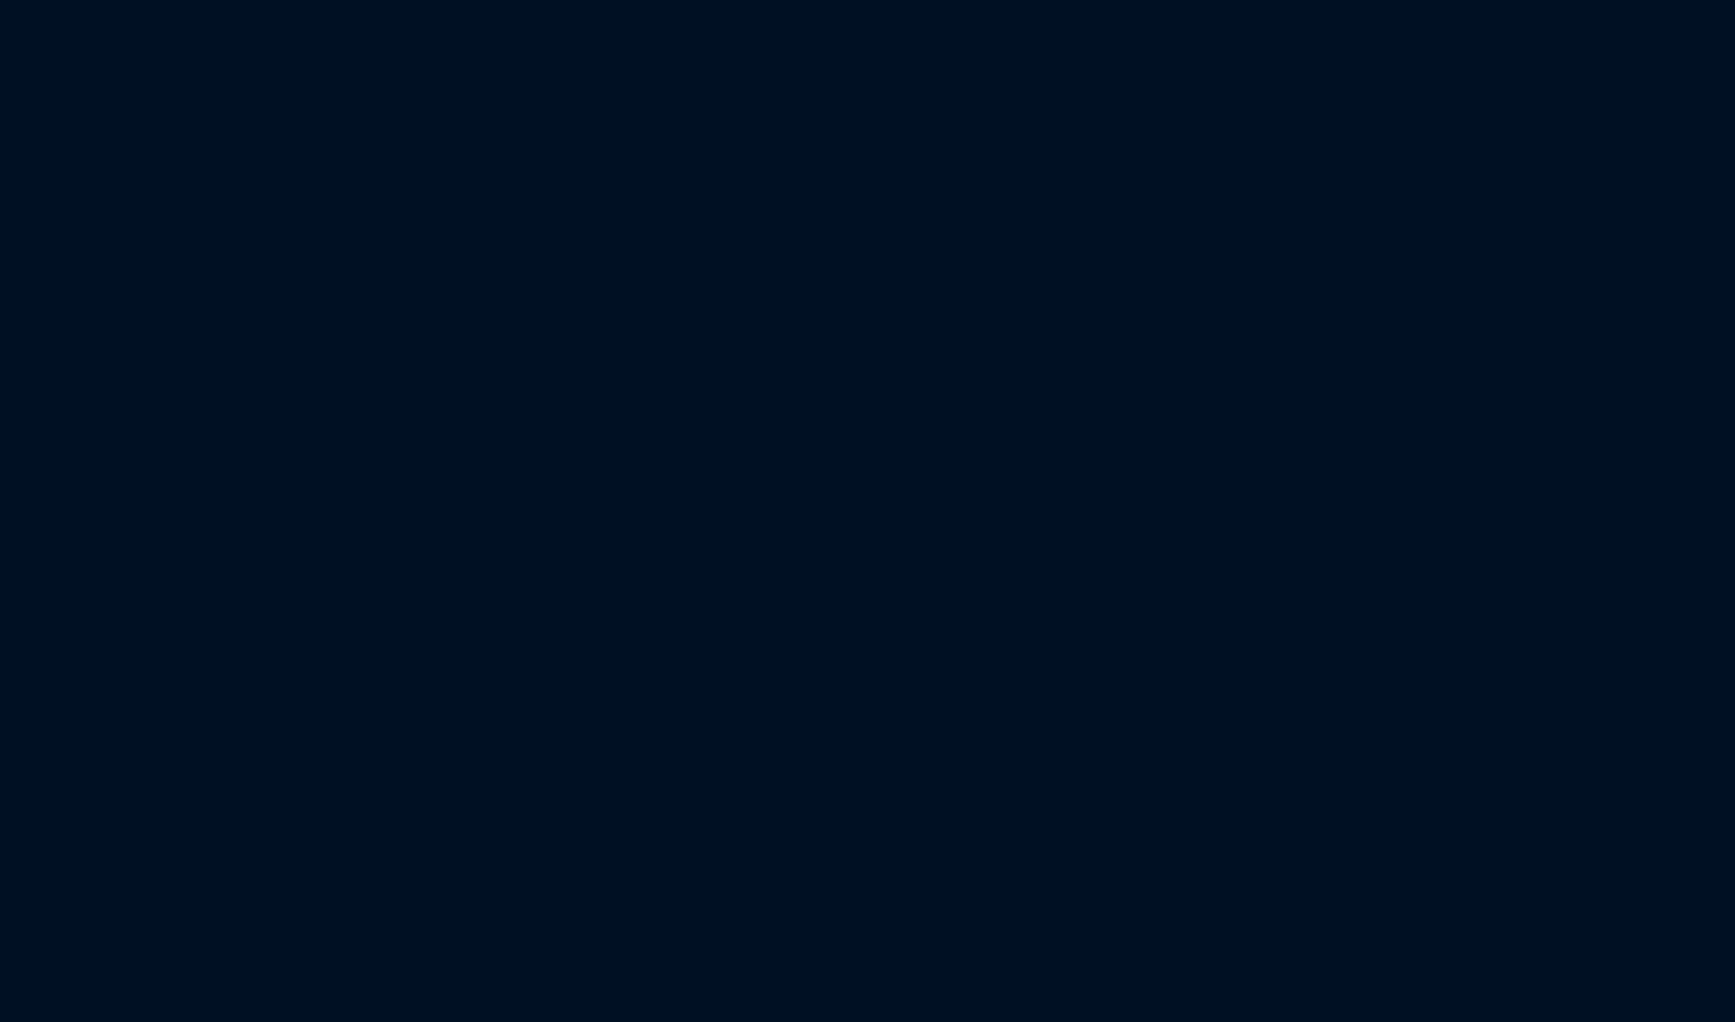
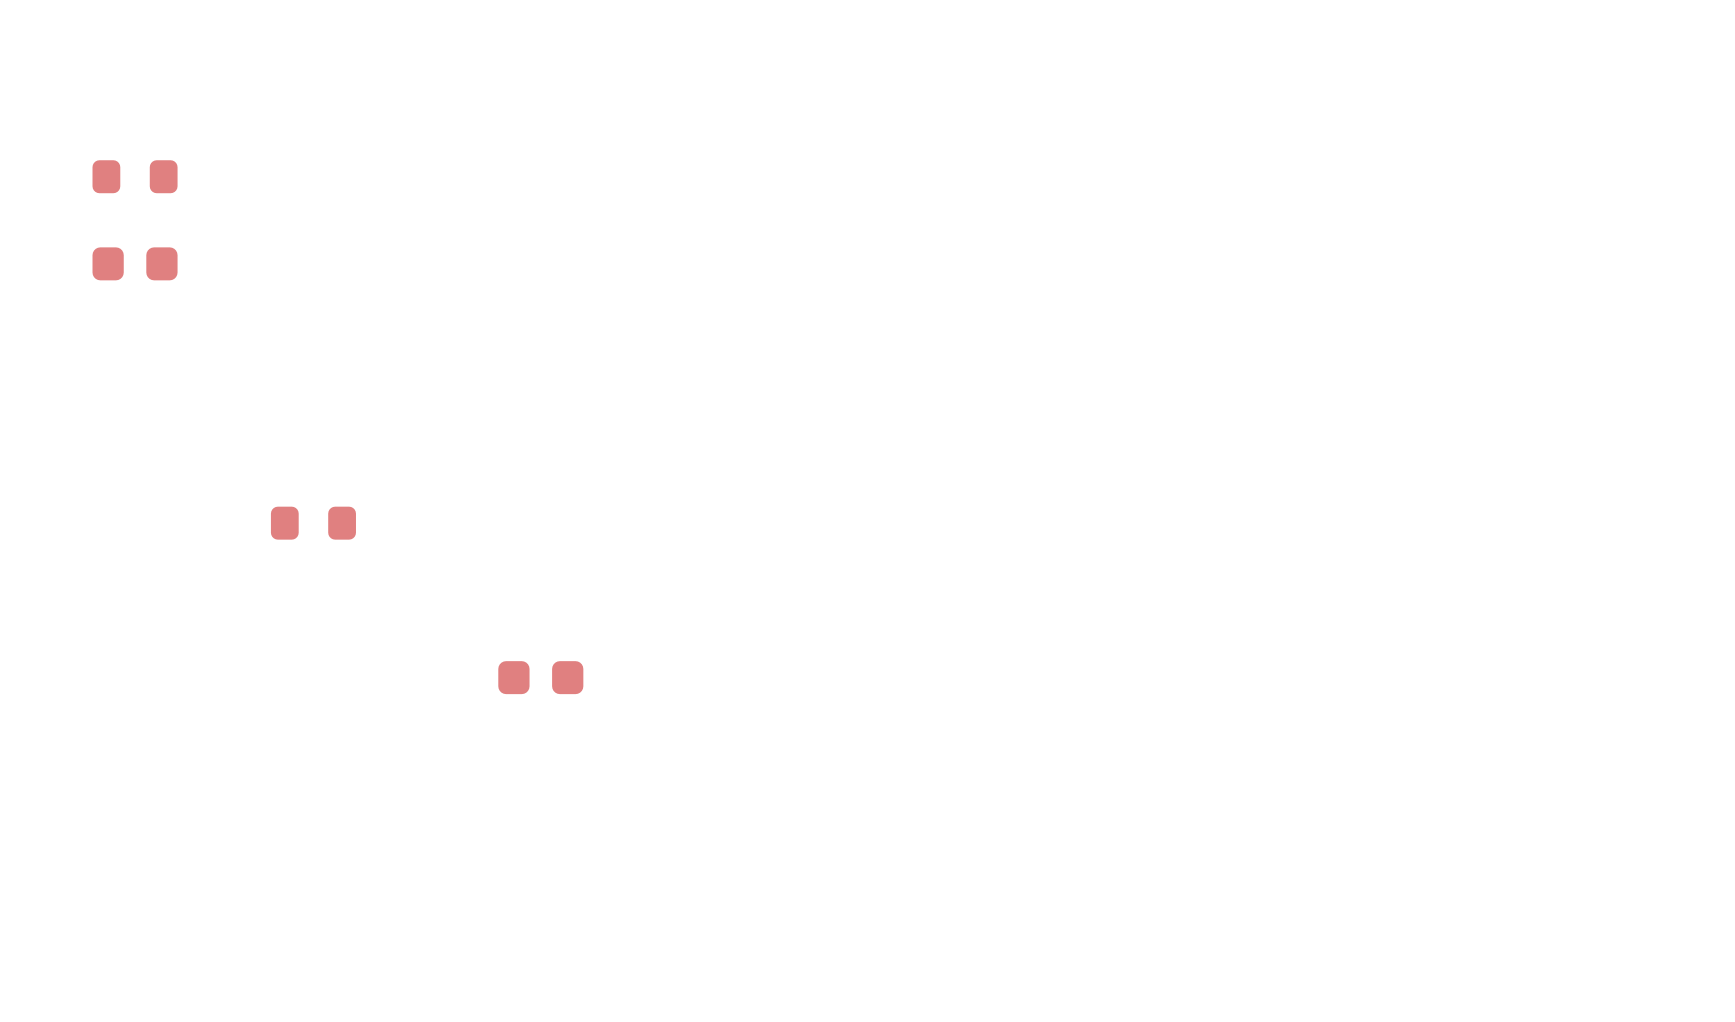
part: none -> (135, 176)
part: none -> (135, 263)
part: none -> (313, 523)
part: none -> (540, 677)

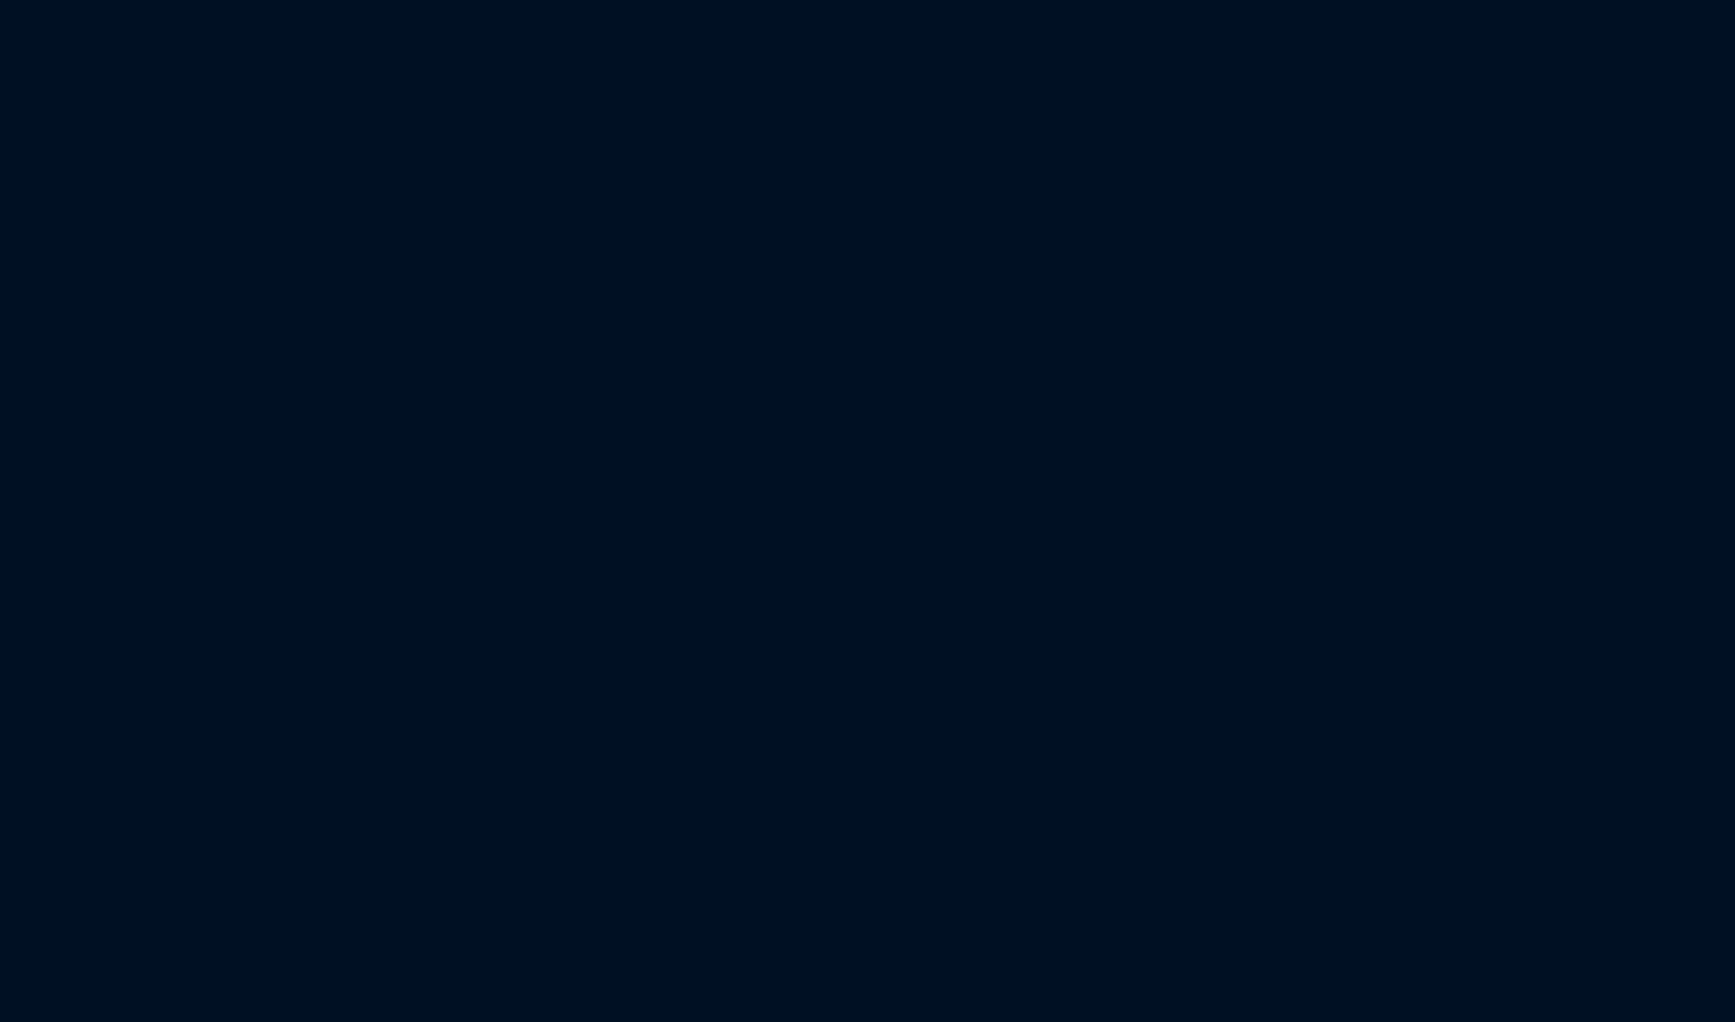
part: (135, 176) -> none
part: (135, 263) -> none
part: (313, 523) -> none
part: (540, 677) -> none

